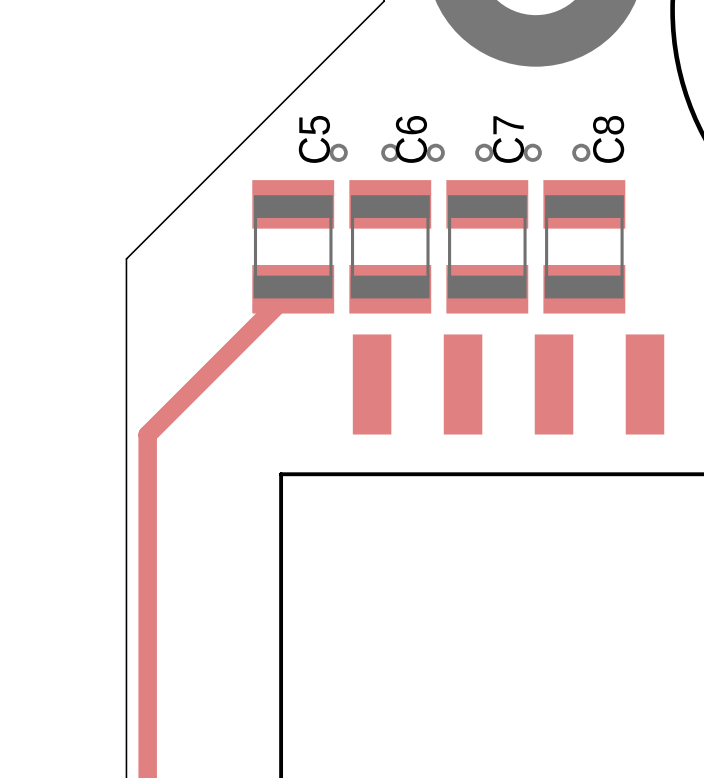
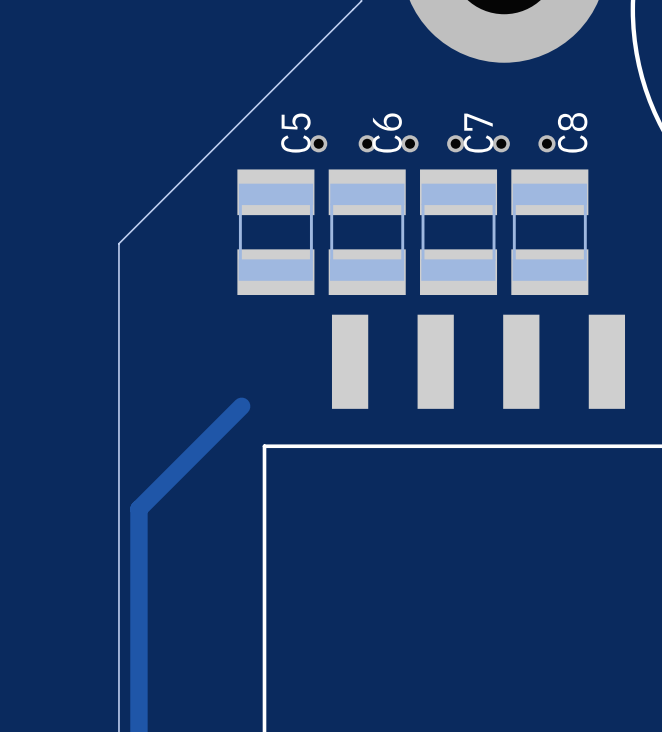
track: (293, 289) (147, 434) (147, 540) -> (241, 406) (138, 509)

